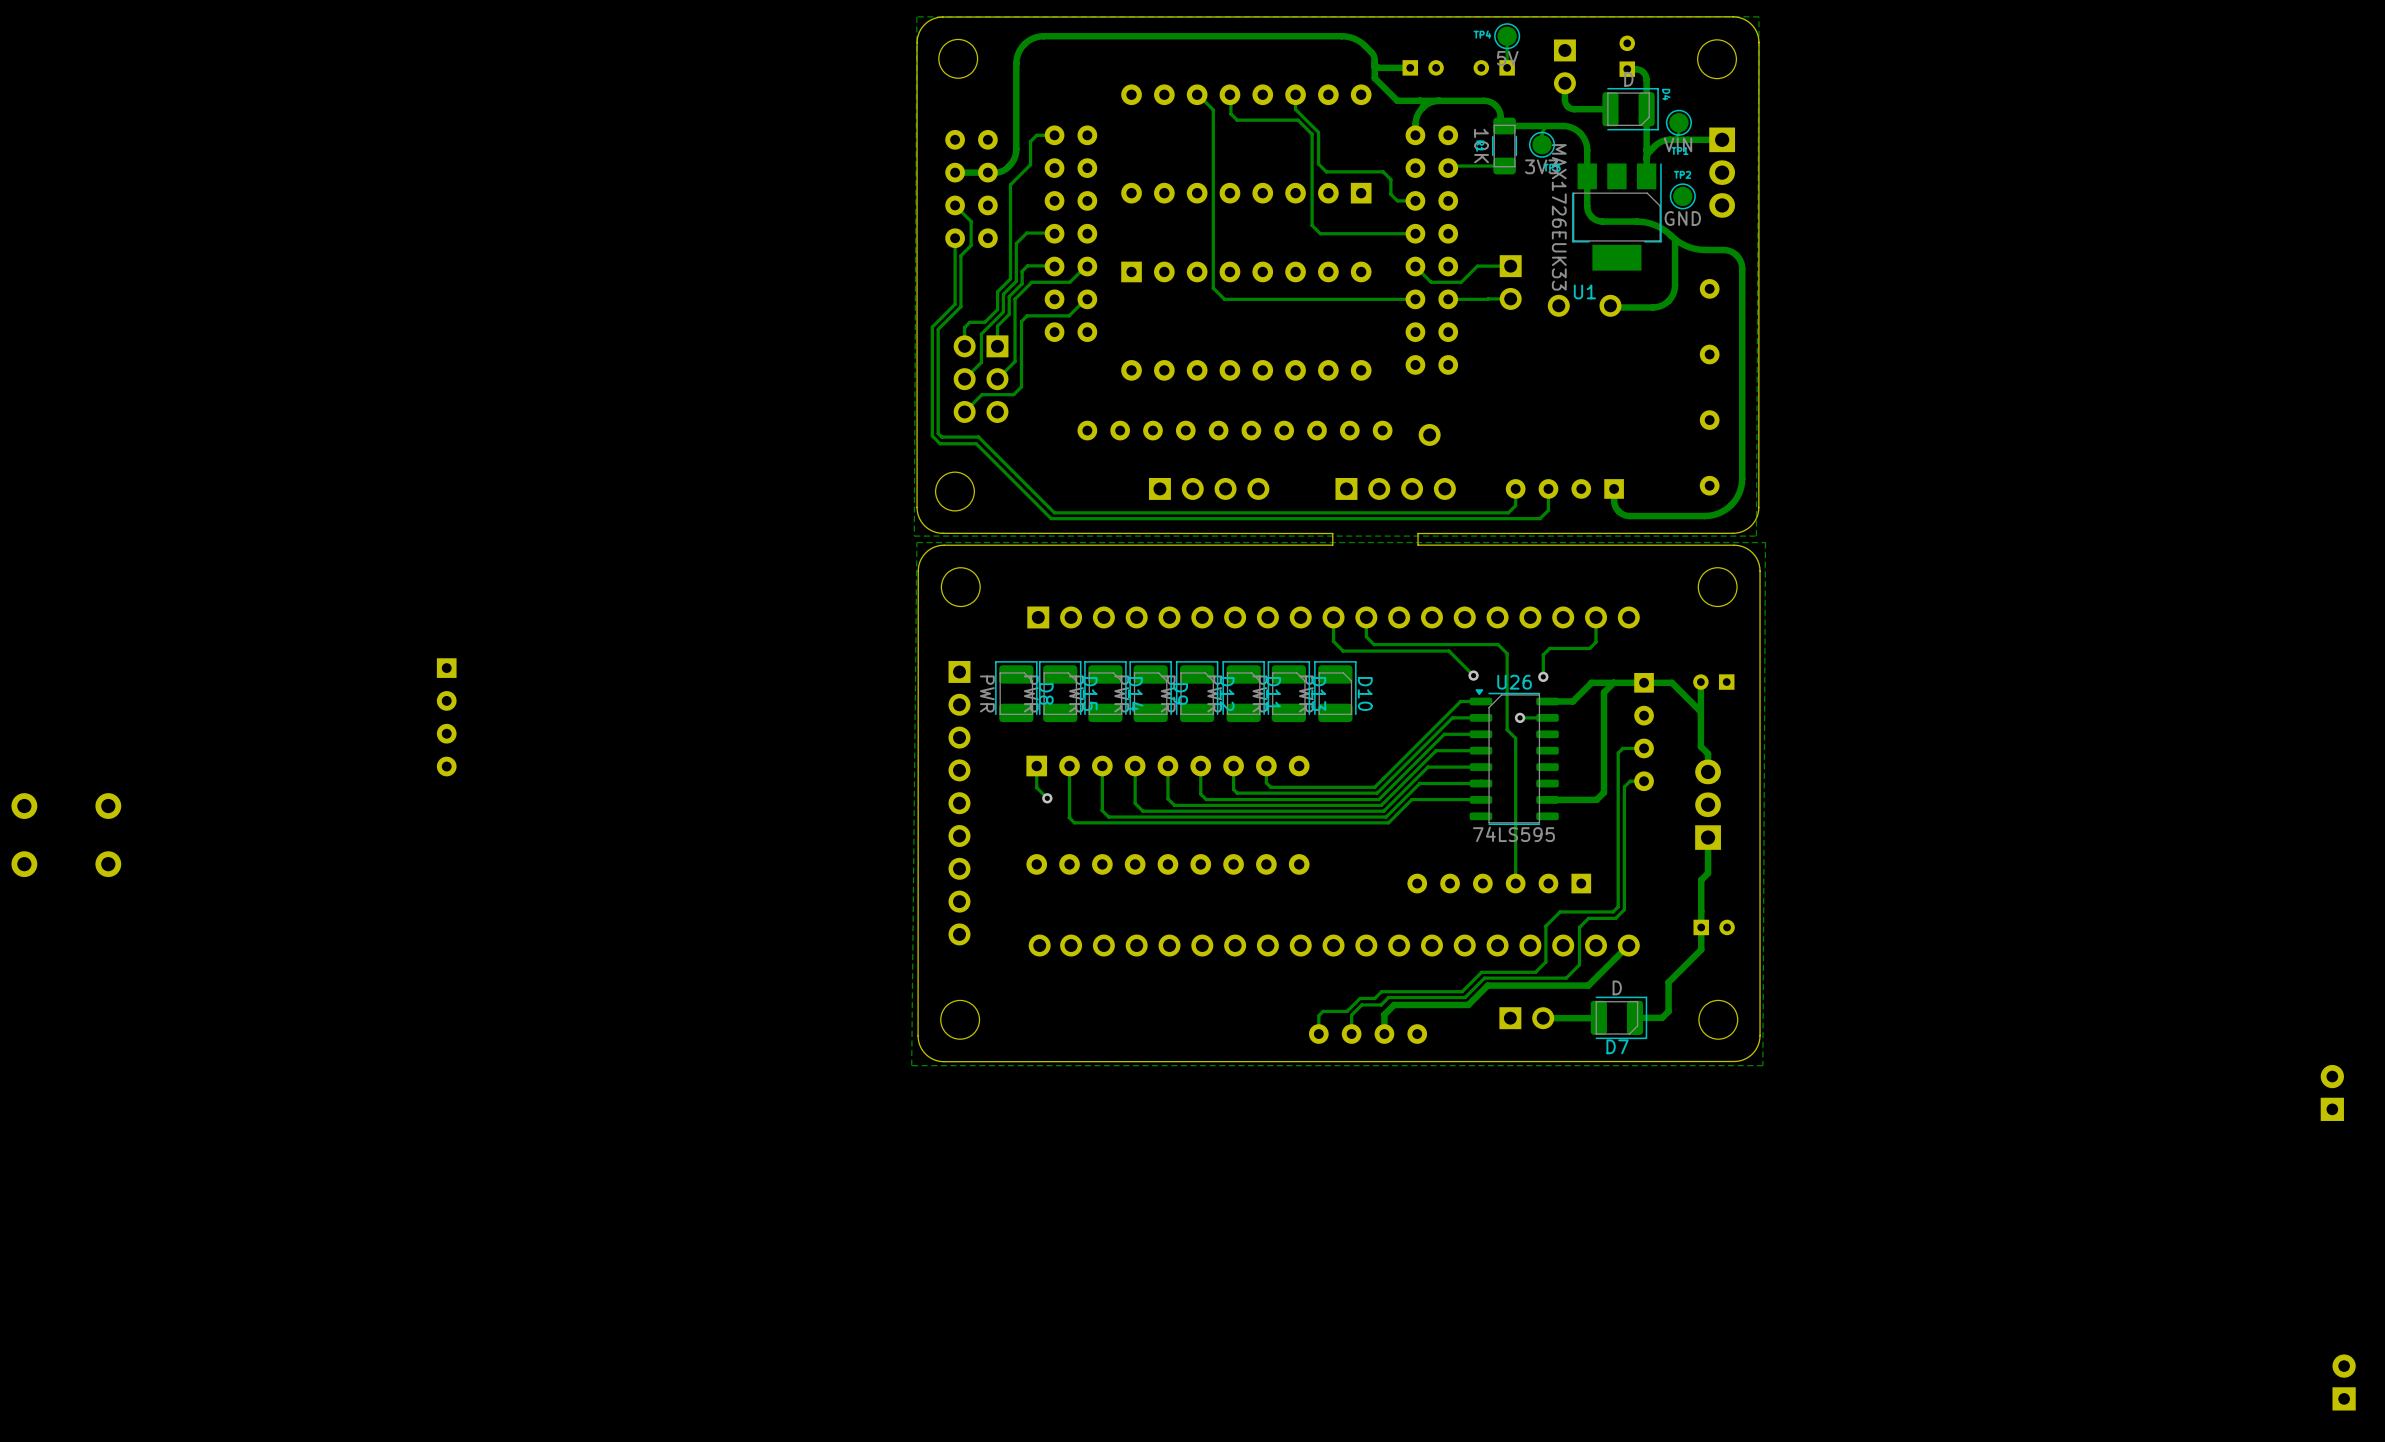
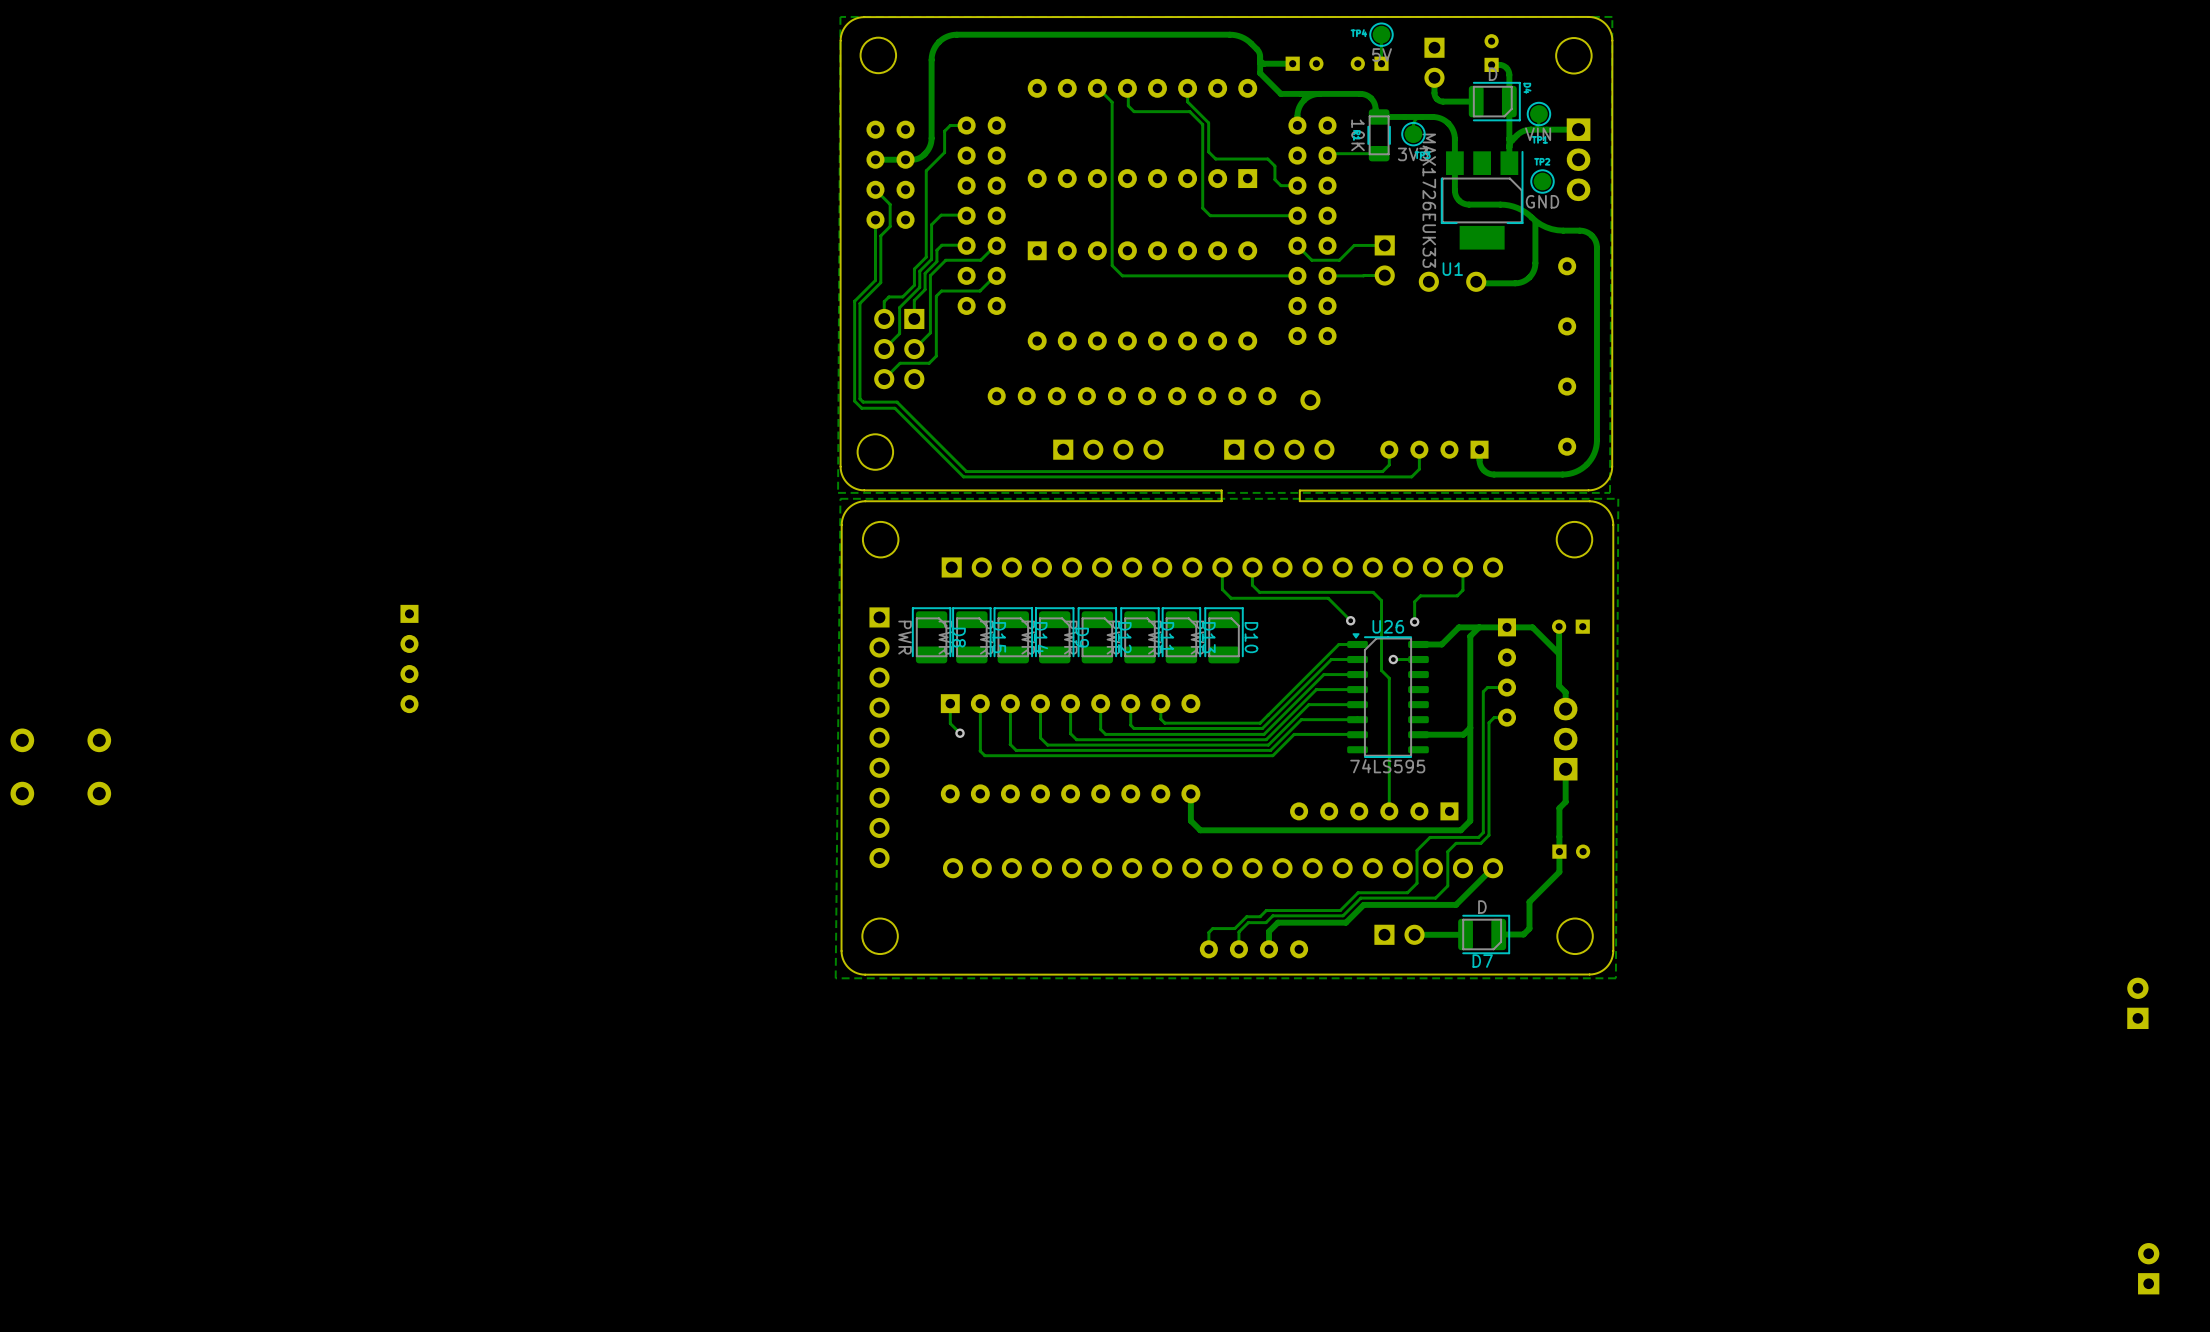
track: none -> (1470, 727) (1470, 820) (1460, 830) (1200, 830) (1190, 820) (1190, 793)

